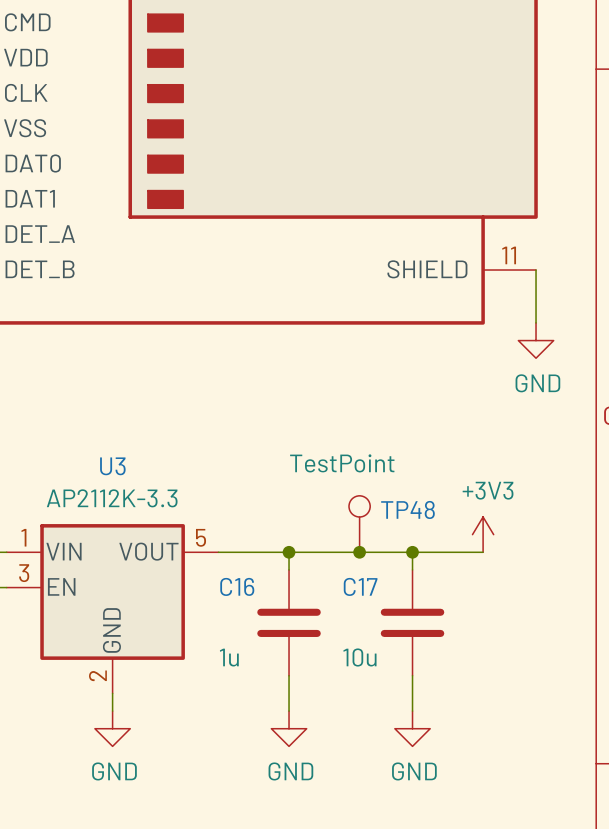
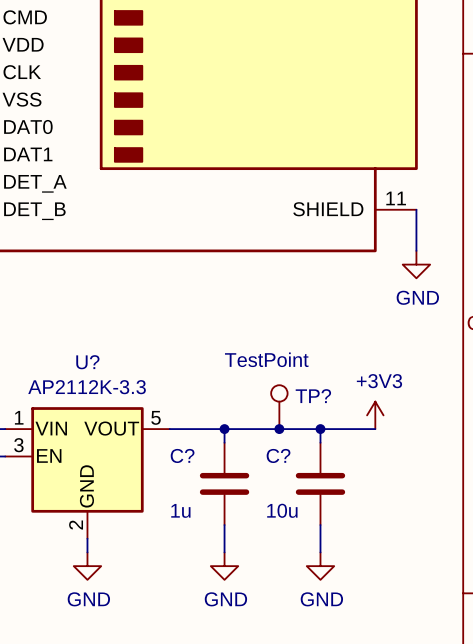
U3 name: U3 (112, 466) -> U? (87, 362)
TP48 name: TP48 (407, 509) -> TP? (313, 396)
C16 name: C16 (237, 586) -> C? (182, 455)
C17 name: C17 (360, 586) -> C? (278, 455)

